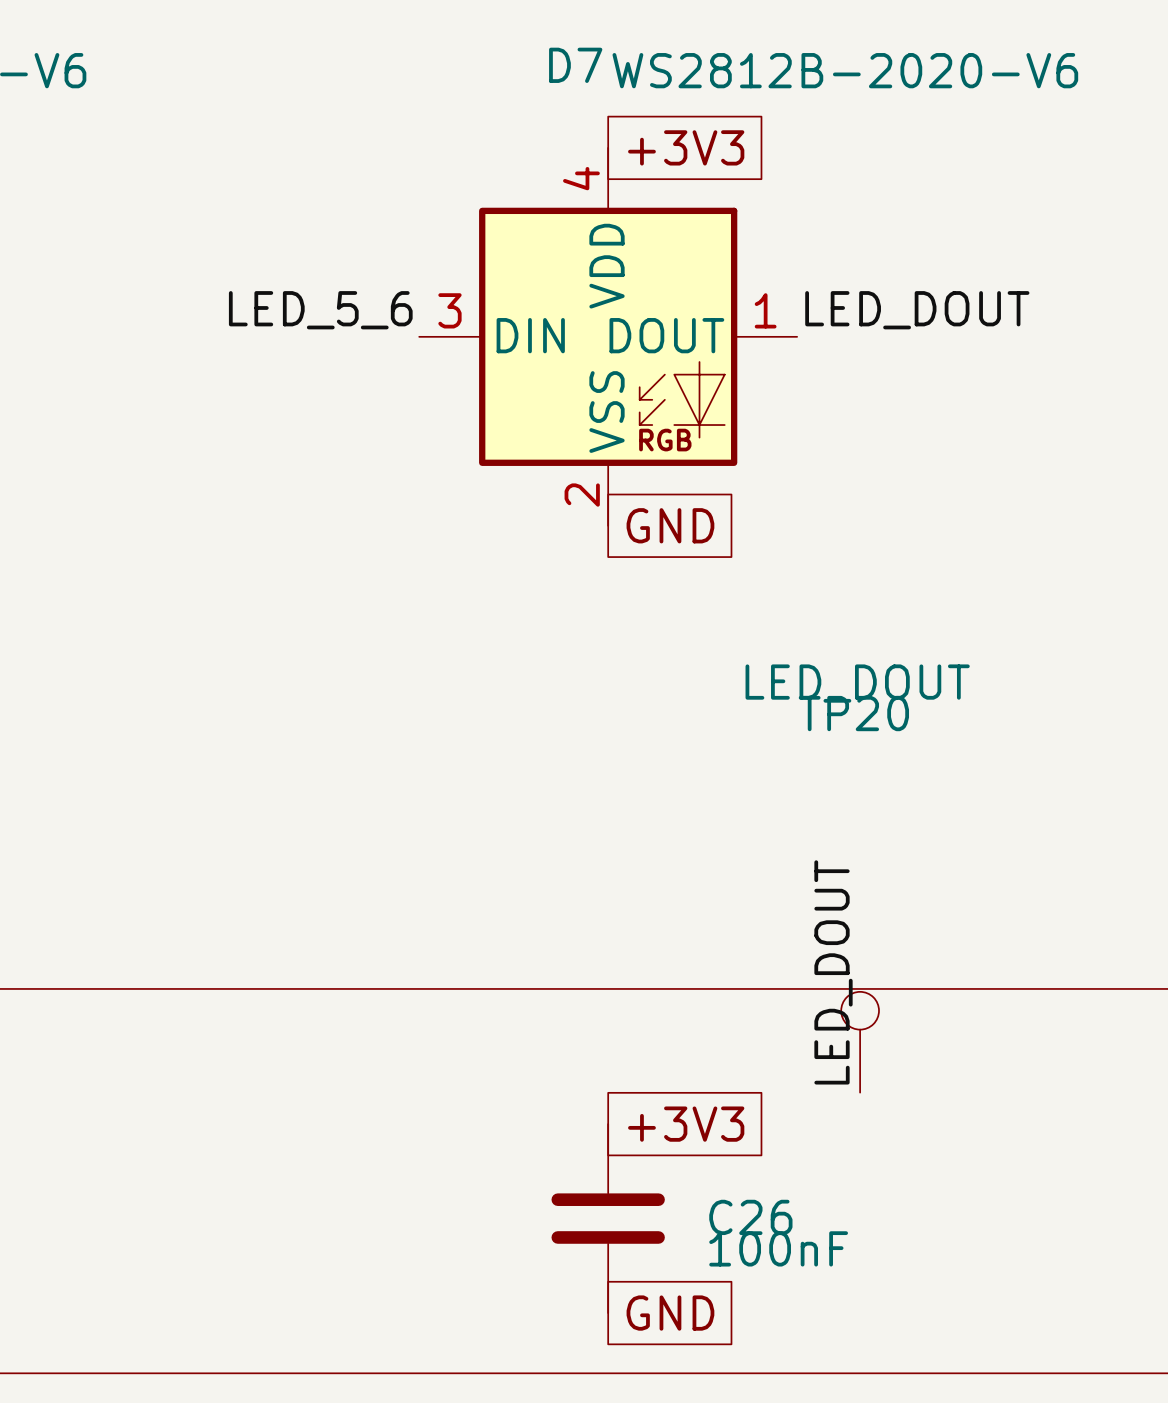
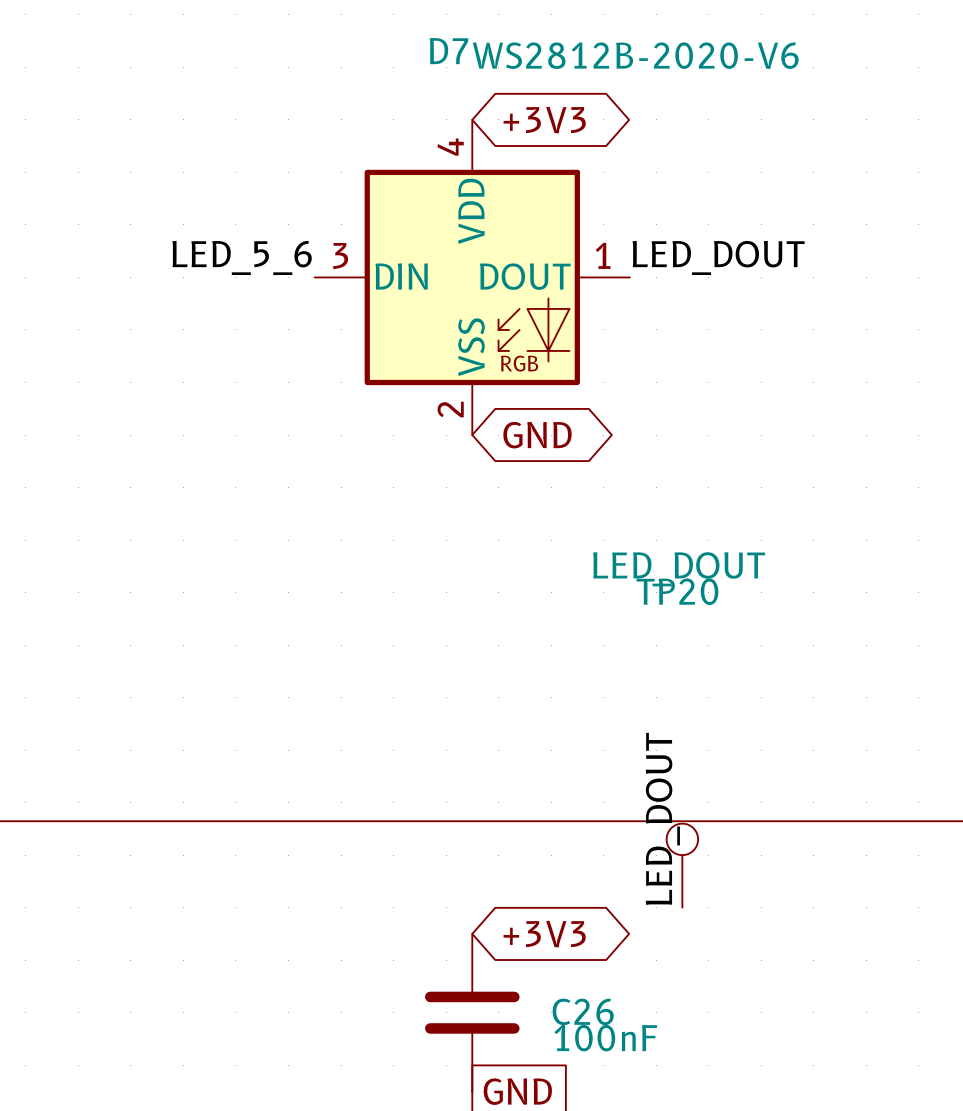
global label shape: passive (686, 147) -> bidirectional (544, 120)
global label shape: passive (670, 525) -> bidirectional (537, 435)
global label shape: passive (686, 1124) -> bidirectional (544, 934)

